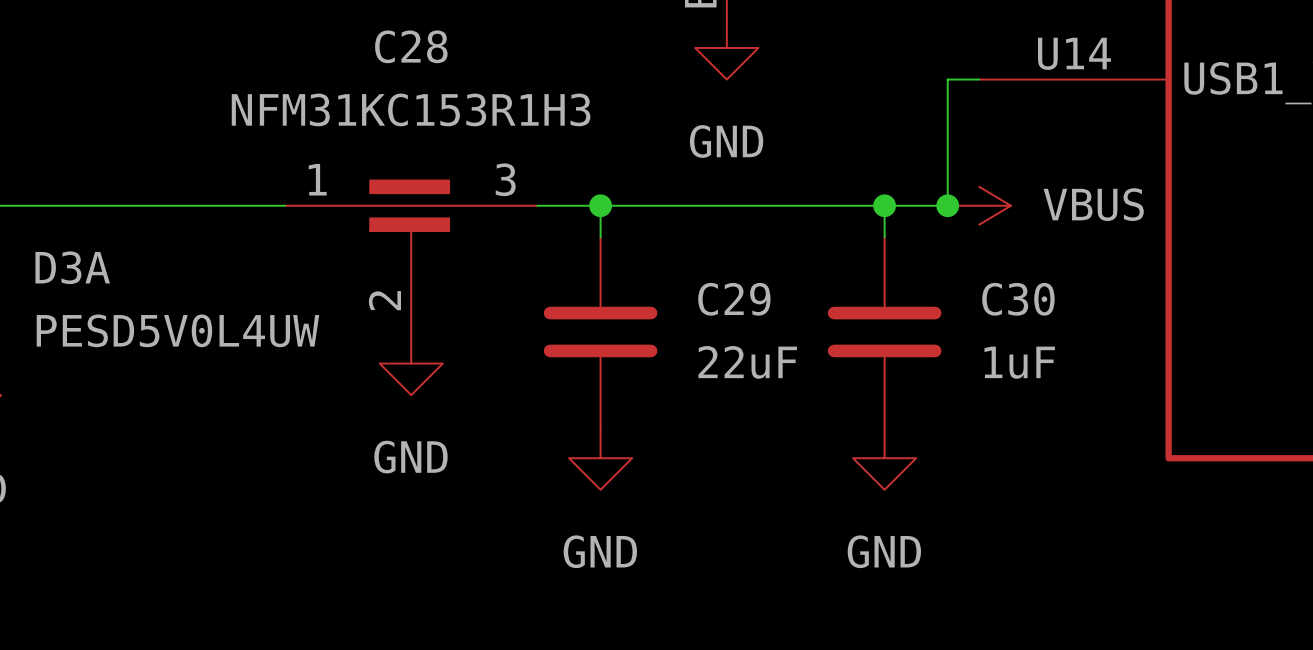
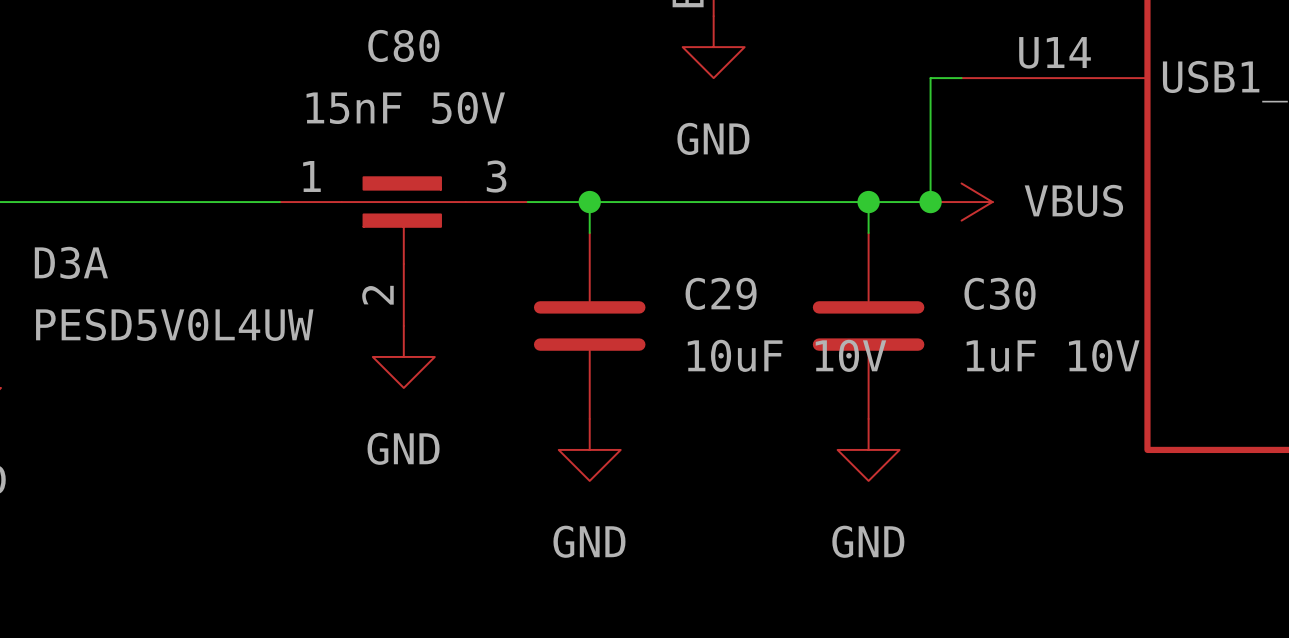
C28 name: C28 (411, 46) -> C80 (403, 45)
C28 value: NFM31KC153R1H3 (411, 109) -> 15nF 50V (405, 107)
C29 value: 22uF (747, 362) -> 10uF 10V (786, 355)
C30 value: 1uF (1019, 362) -> 1uF 10V (1053, 355)

